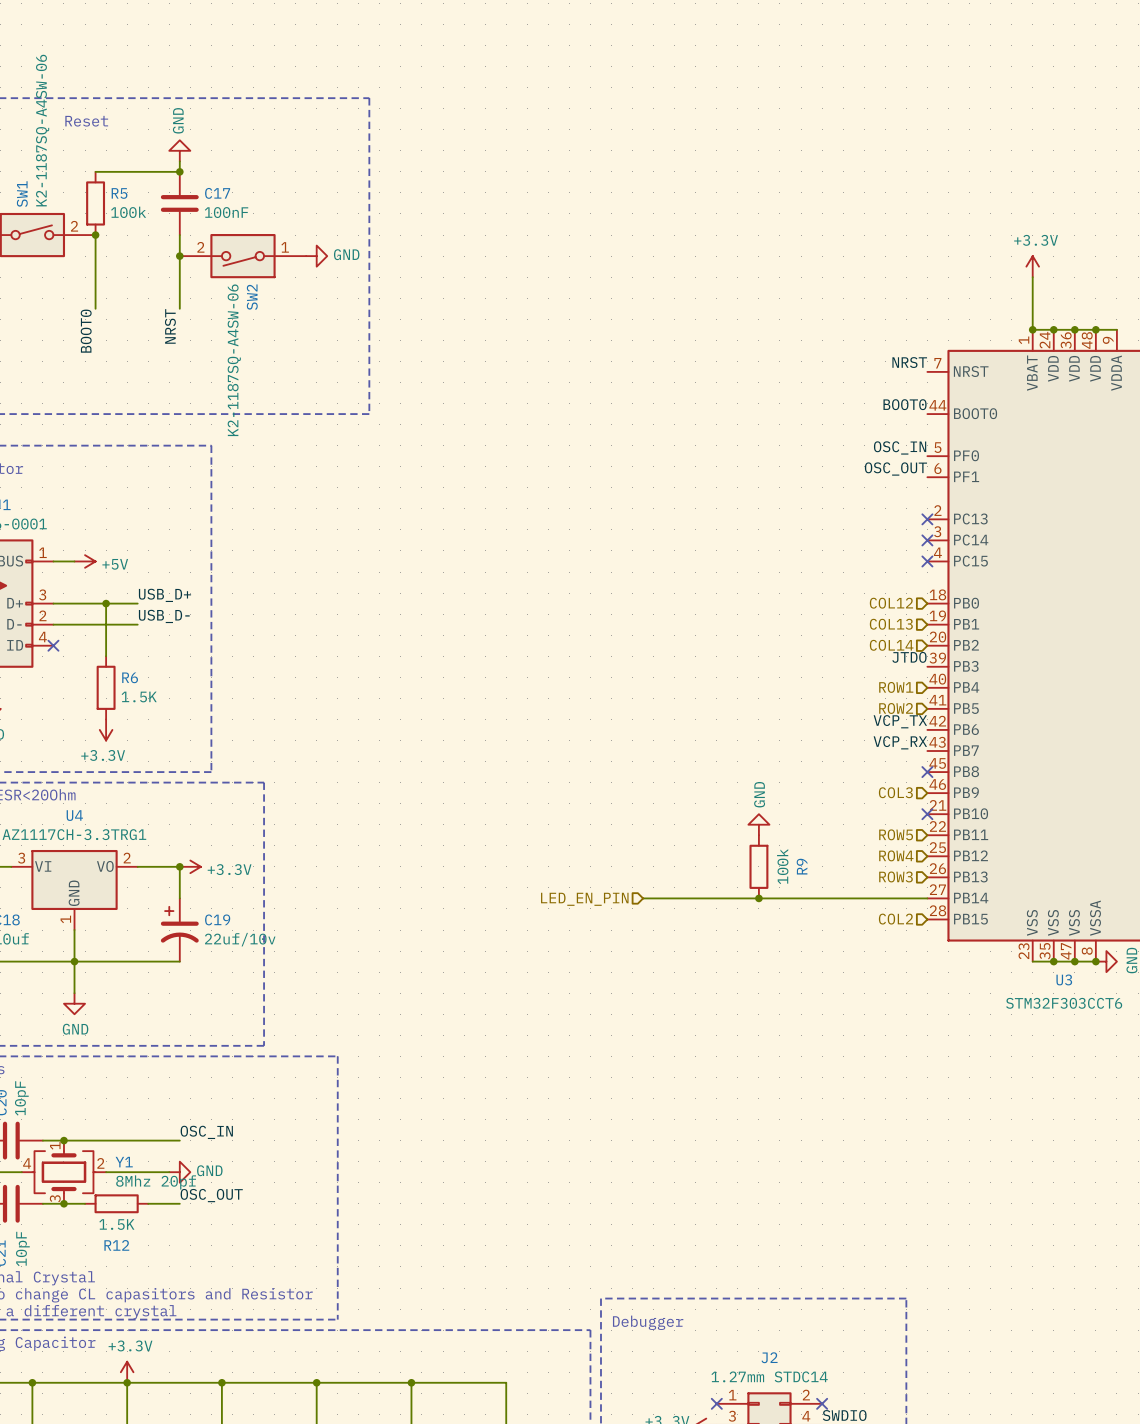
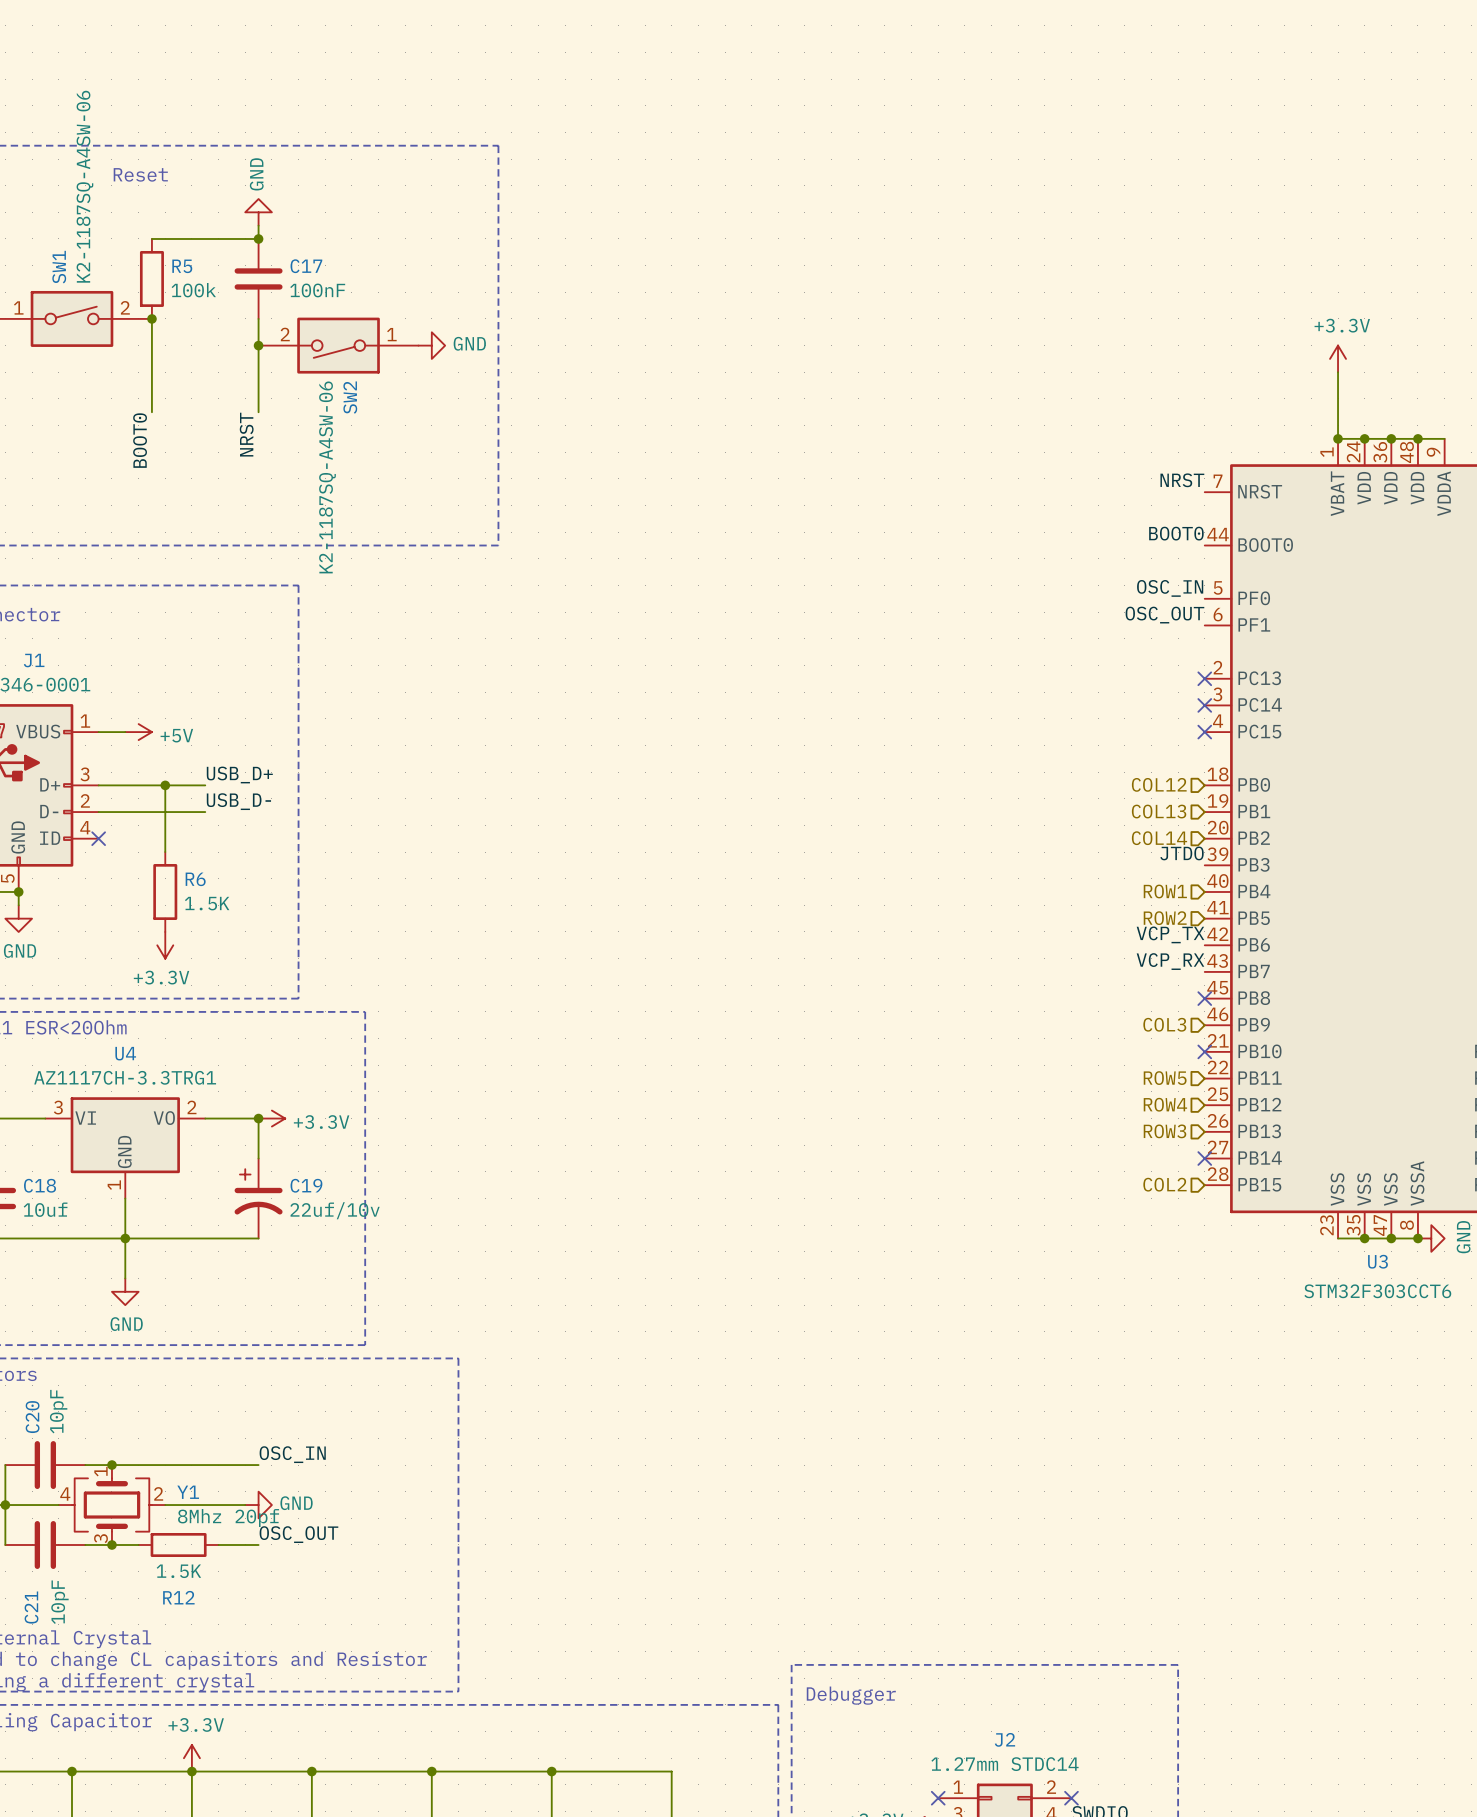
power symbol: GND (758, 824) -> none
R9: 100k (758, 866) -> none
wire: (643, 898) (927, 898) -> none
junction: (758, 898) -> none
no-connect mark: none -> (1204, 1158)
hierarchical label: LED_EN_PIN (584, 899) -> none

